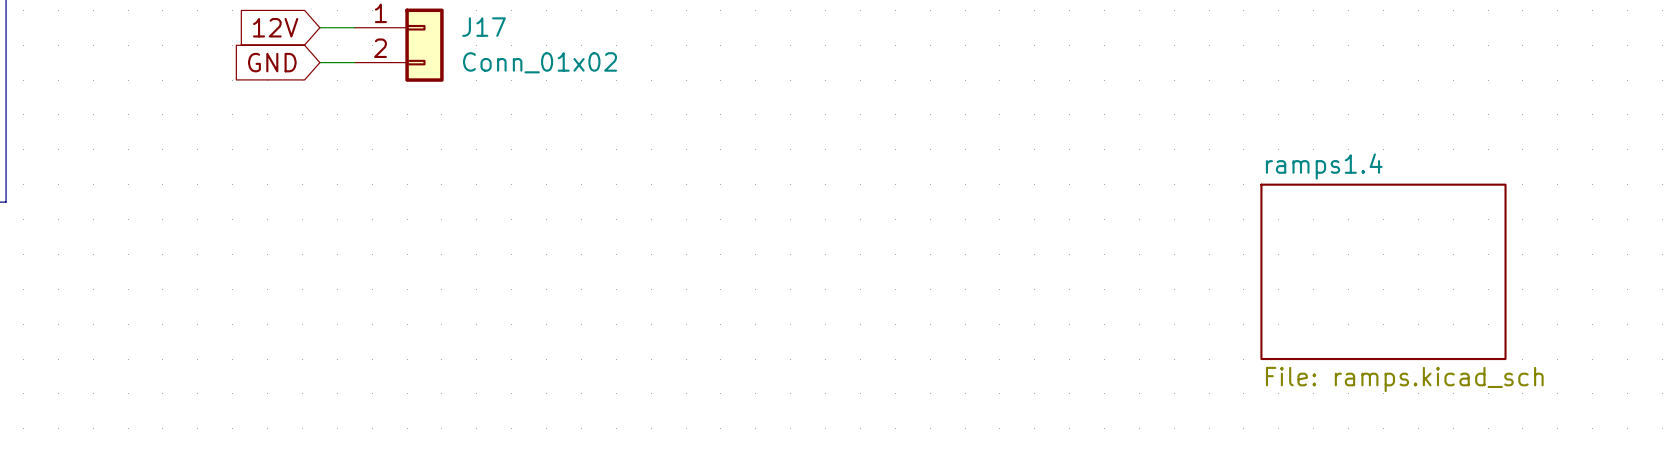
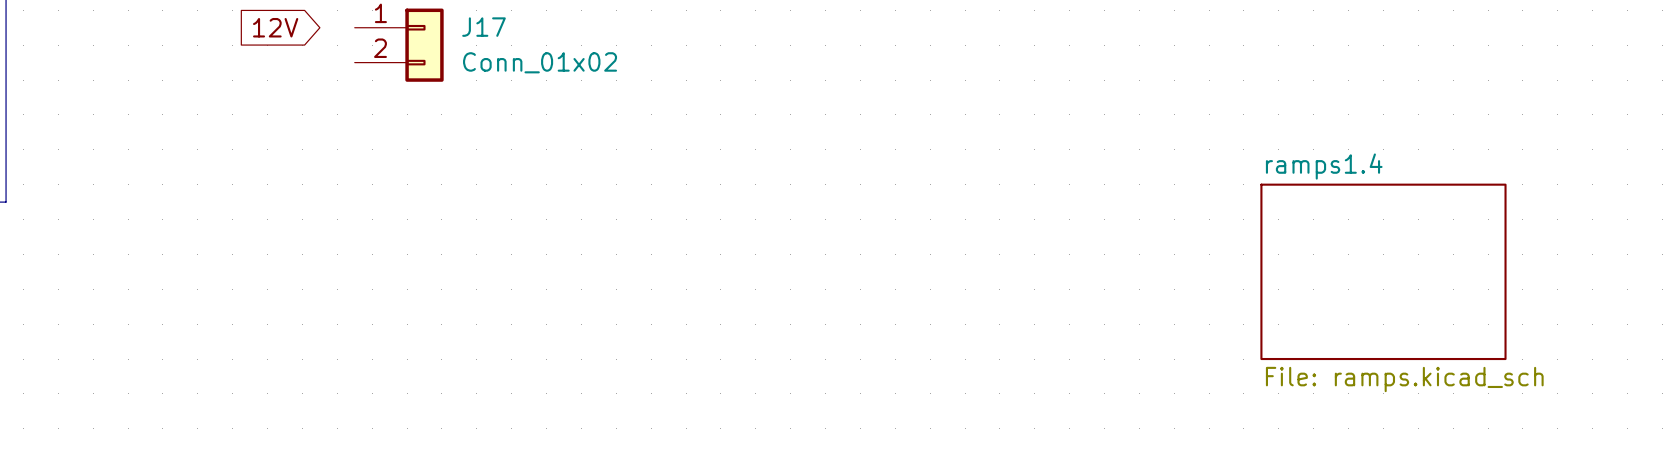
wire: (319, 27) (354, 27) -> none
global label: GND (272, 62) -> none
wire: (319, 62) (354, 62) -> none

